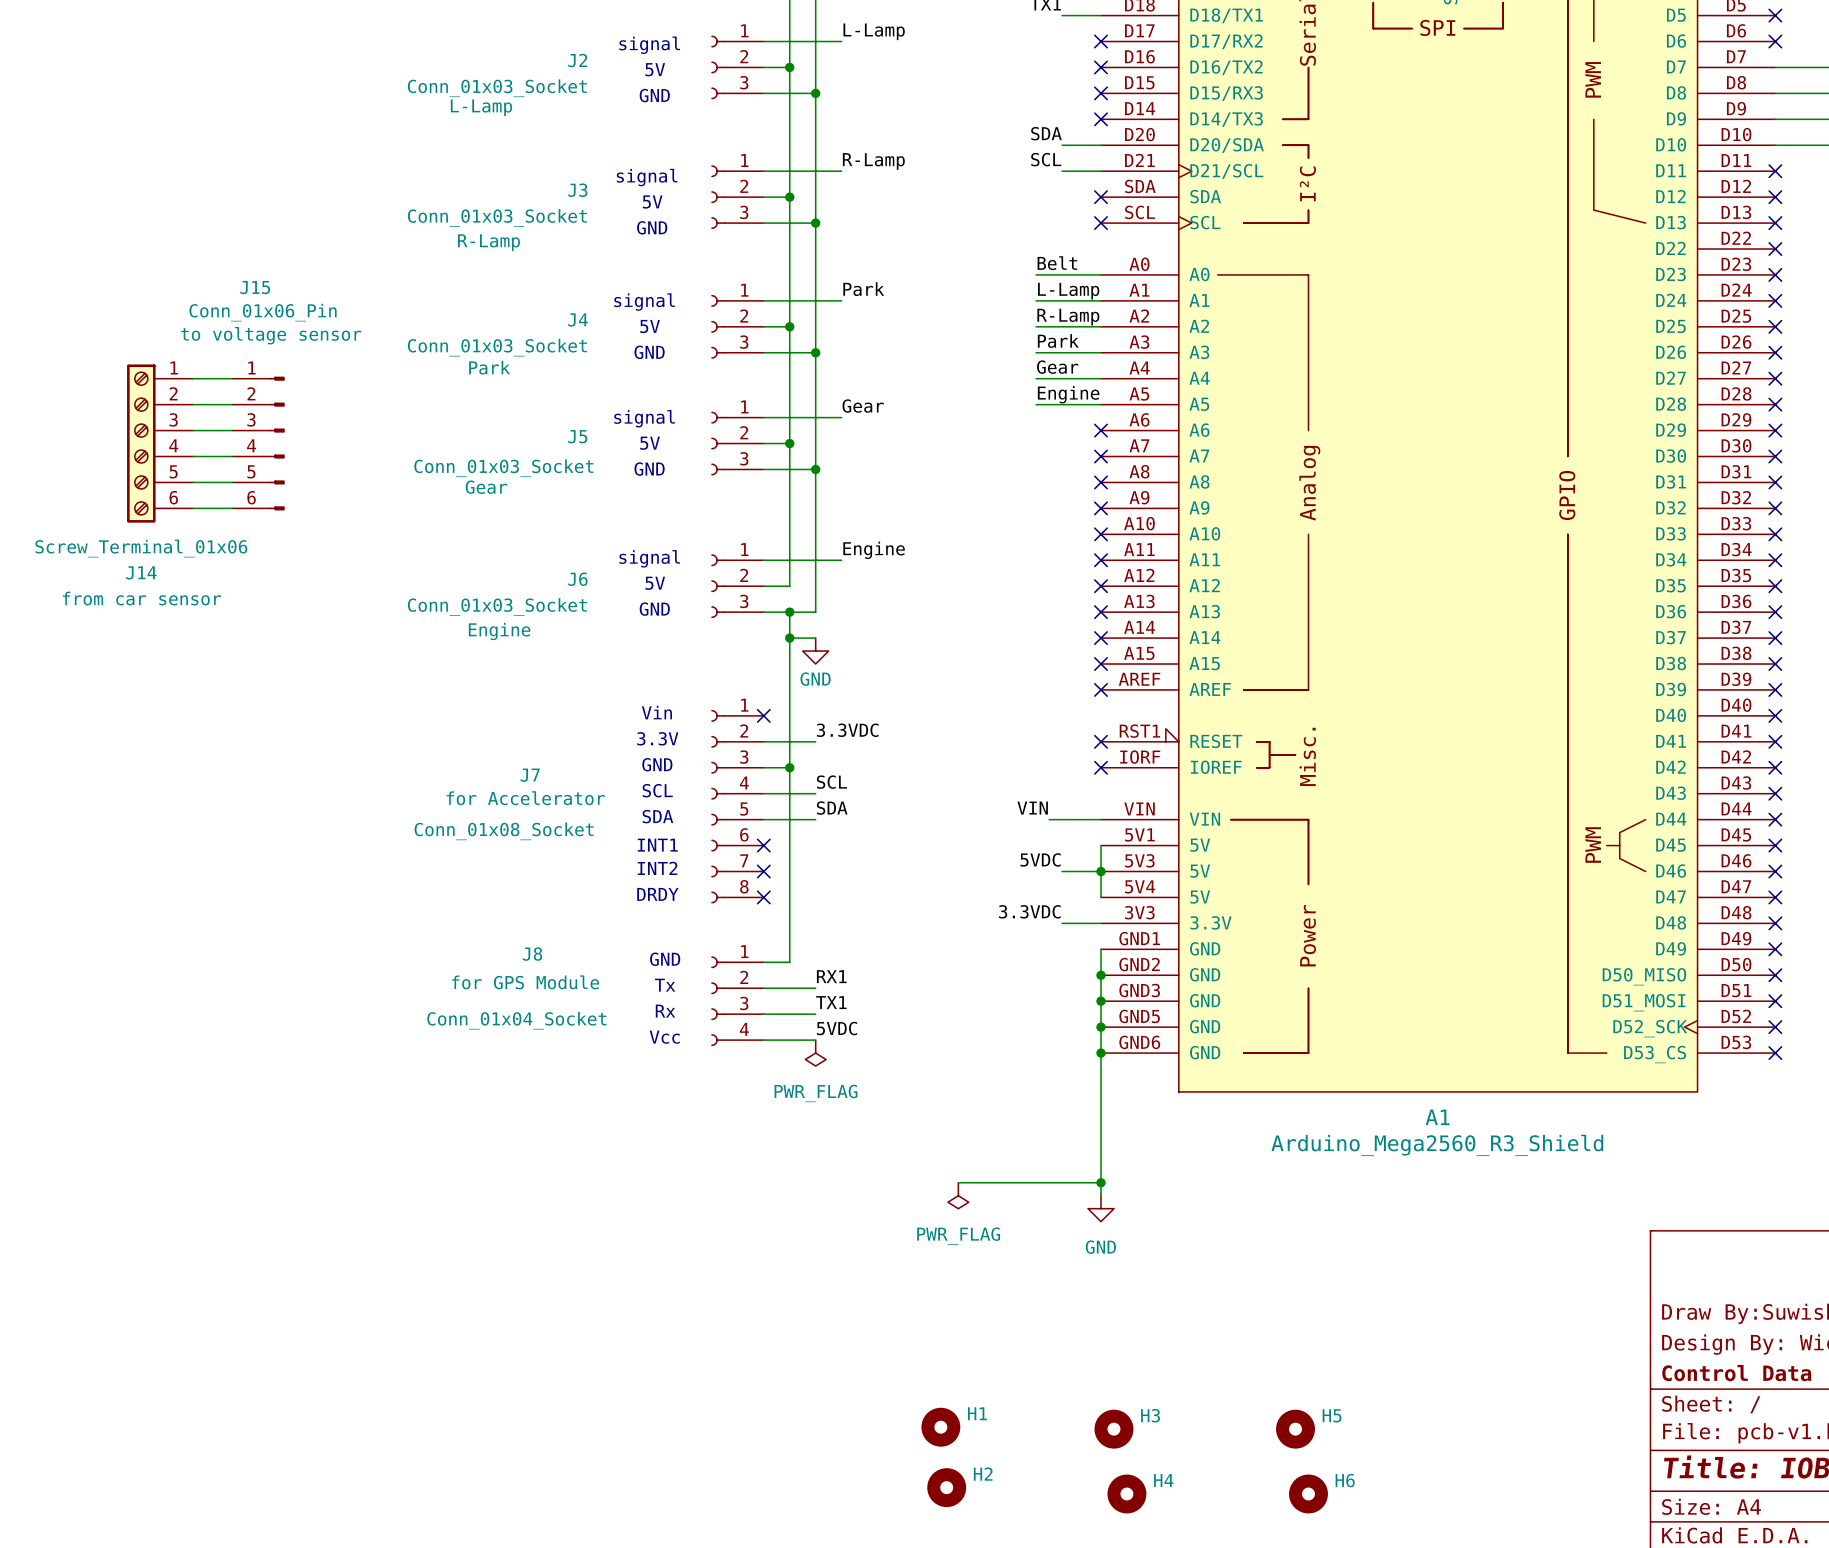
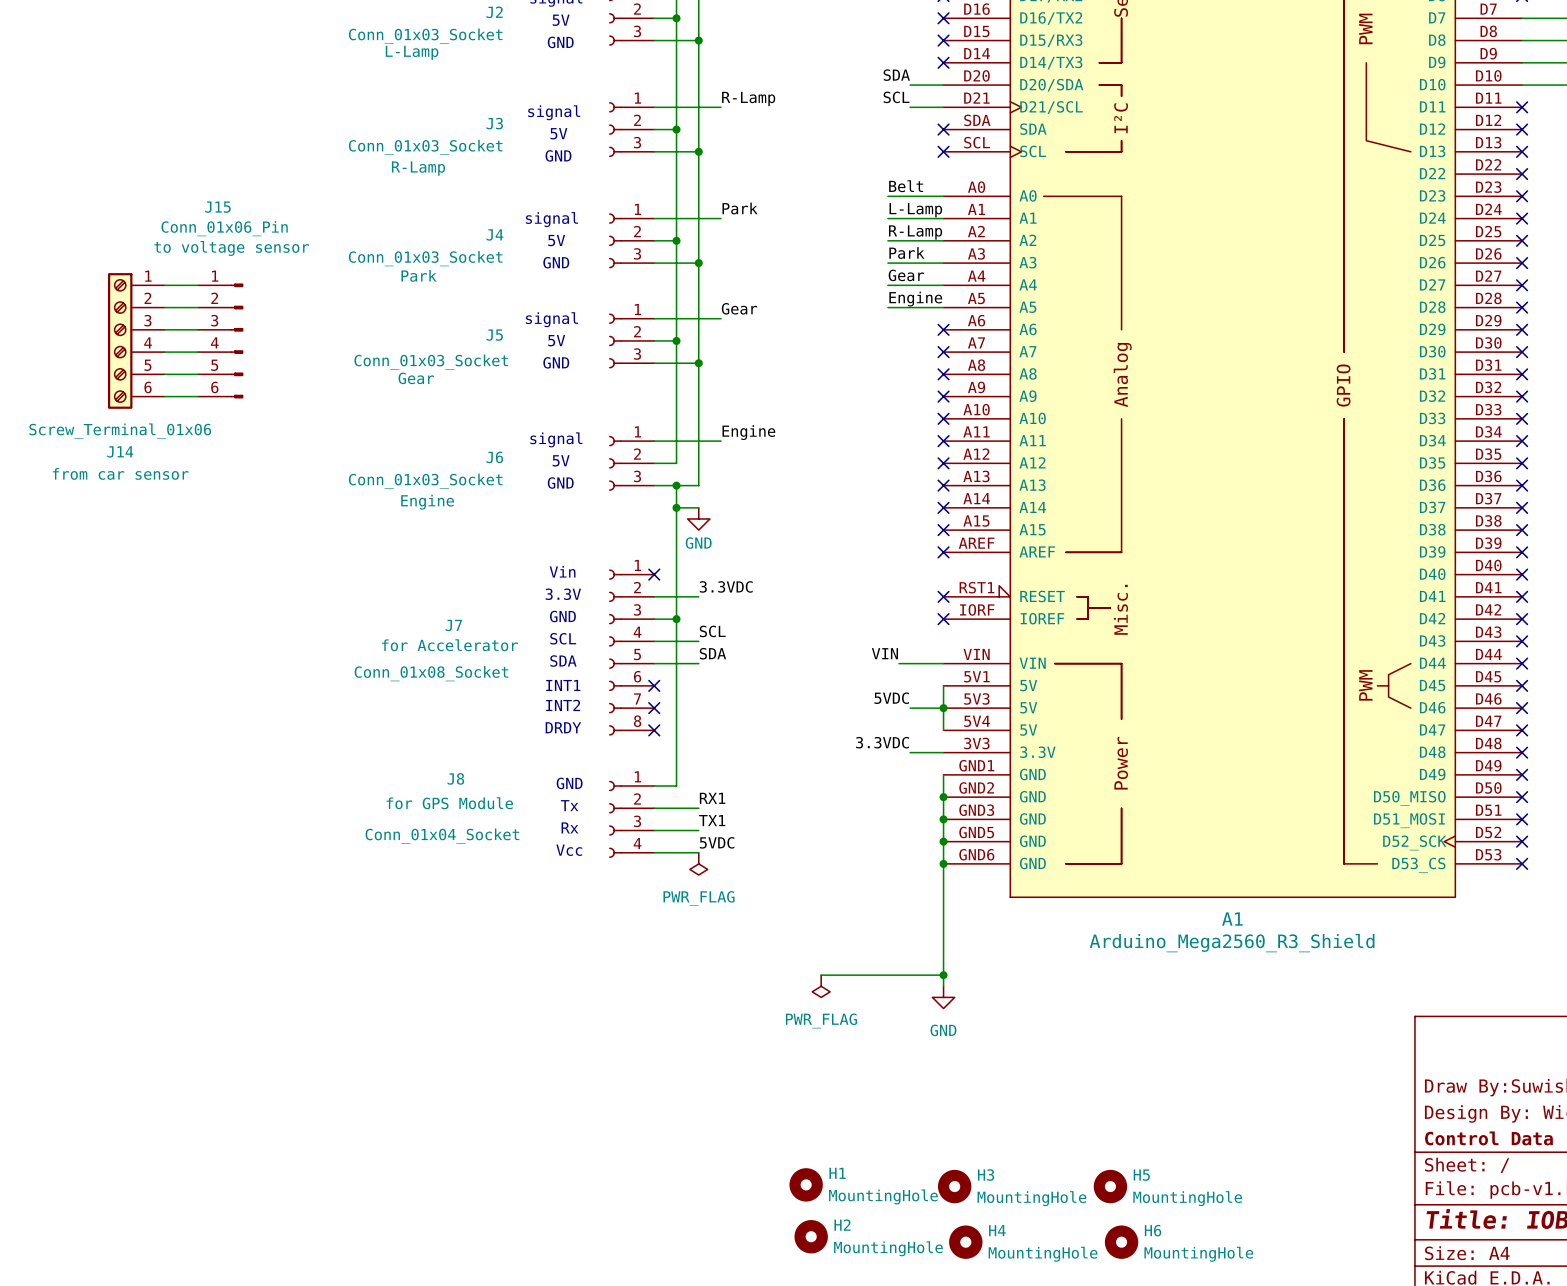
H1 value: none -> MountingHole (883, 1196)
H3 value: none -> MountingHole (1031, 1198)
H5 value: none -> MountingHole (1187, 1198)
H2 value: none -> MountingHole (888, 1248)
H4 value: none -> MountingHole (1043, 1254)
H6 value: none -> MountingHole (1198, 1254)

